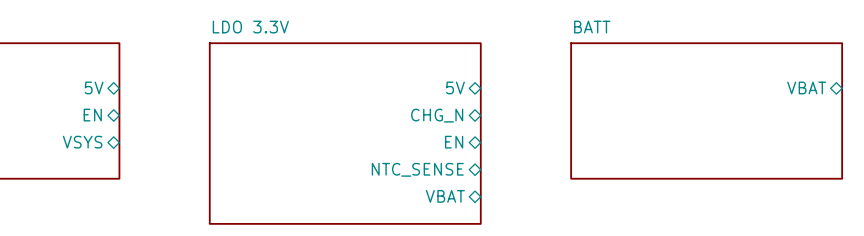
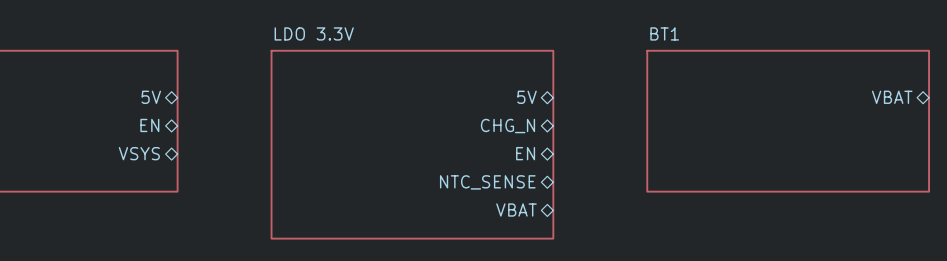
sheet BATT name: BATT (592, 27) -> BT1 (664, 33)

